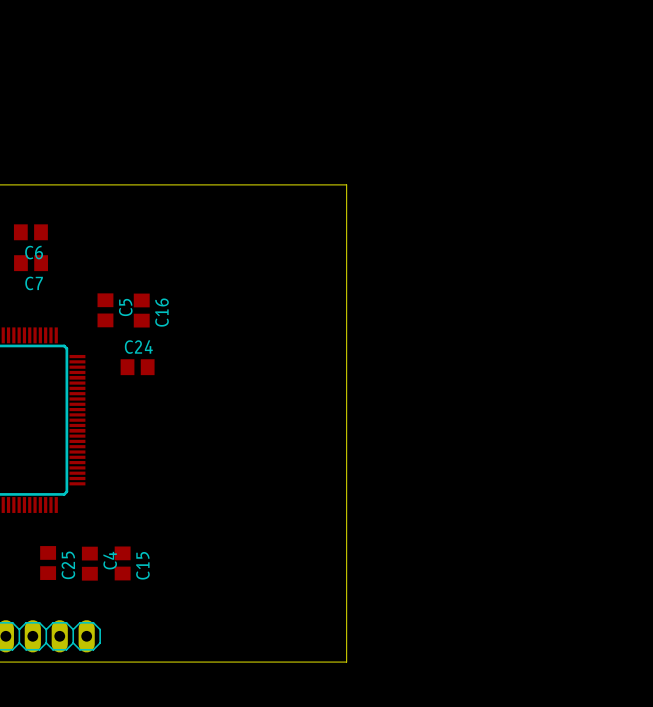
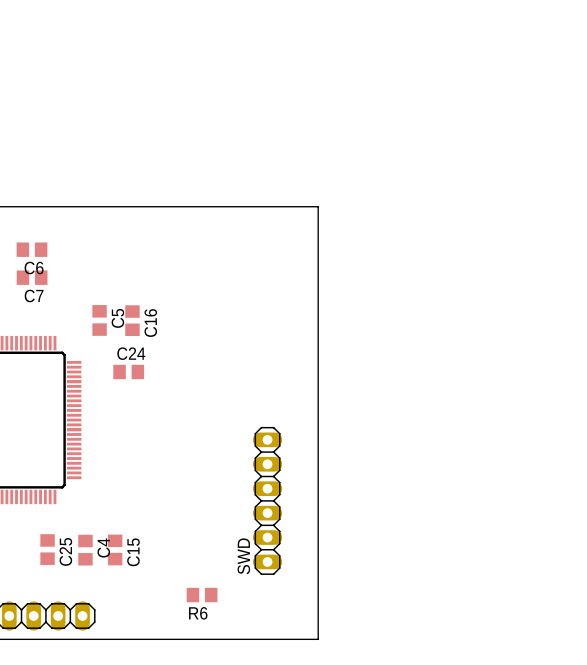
SWD: none -> (267, 500)
R6: none -> (202, 595)

